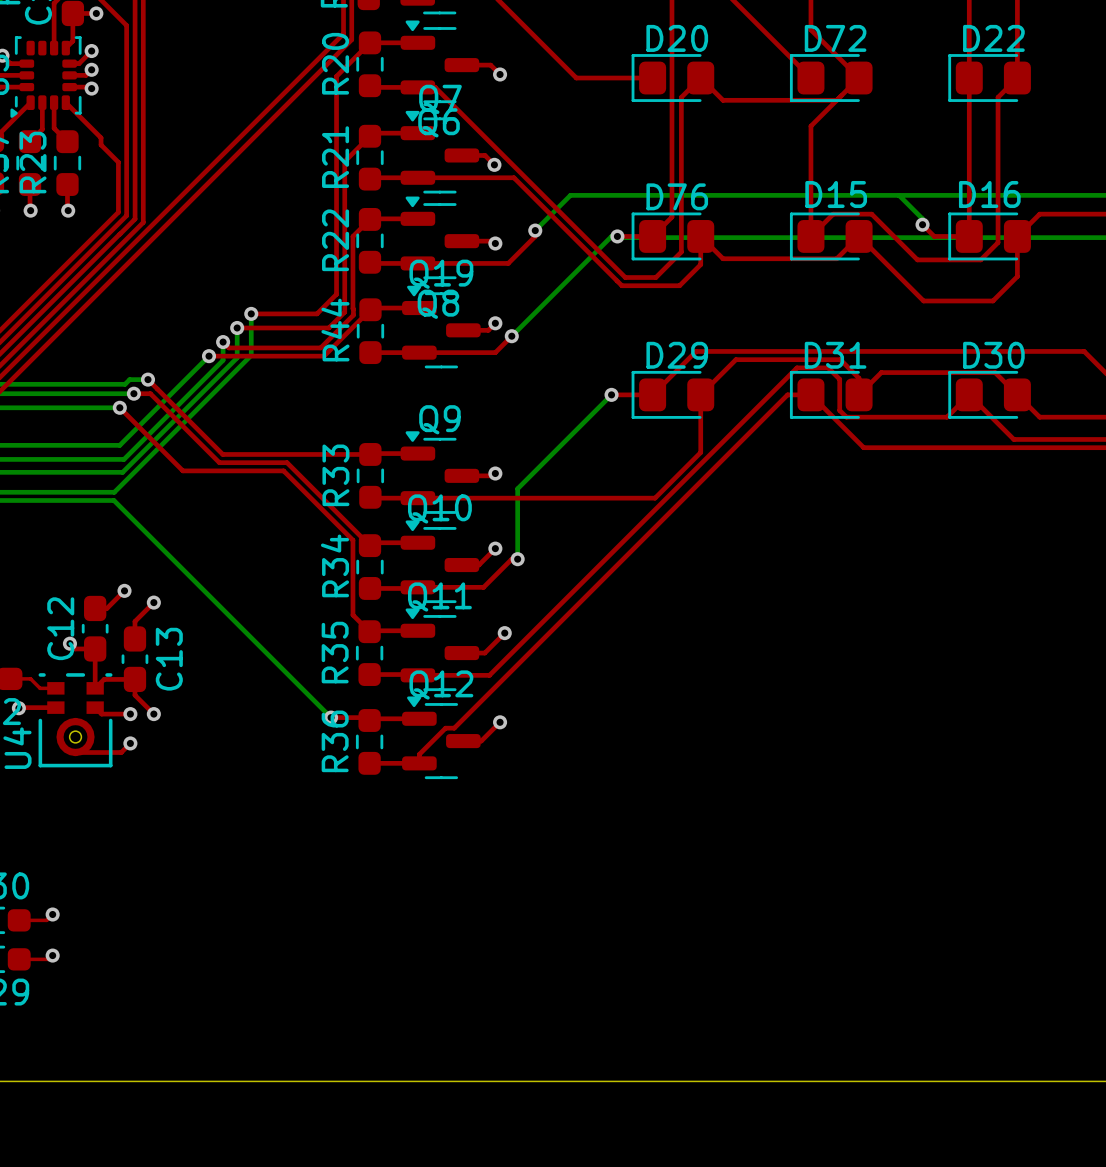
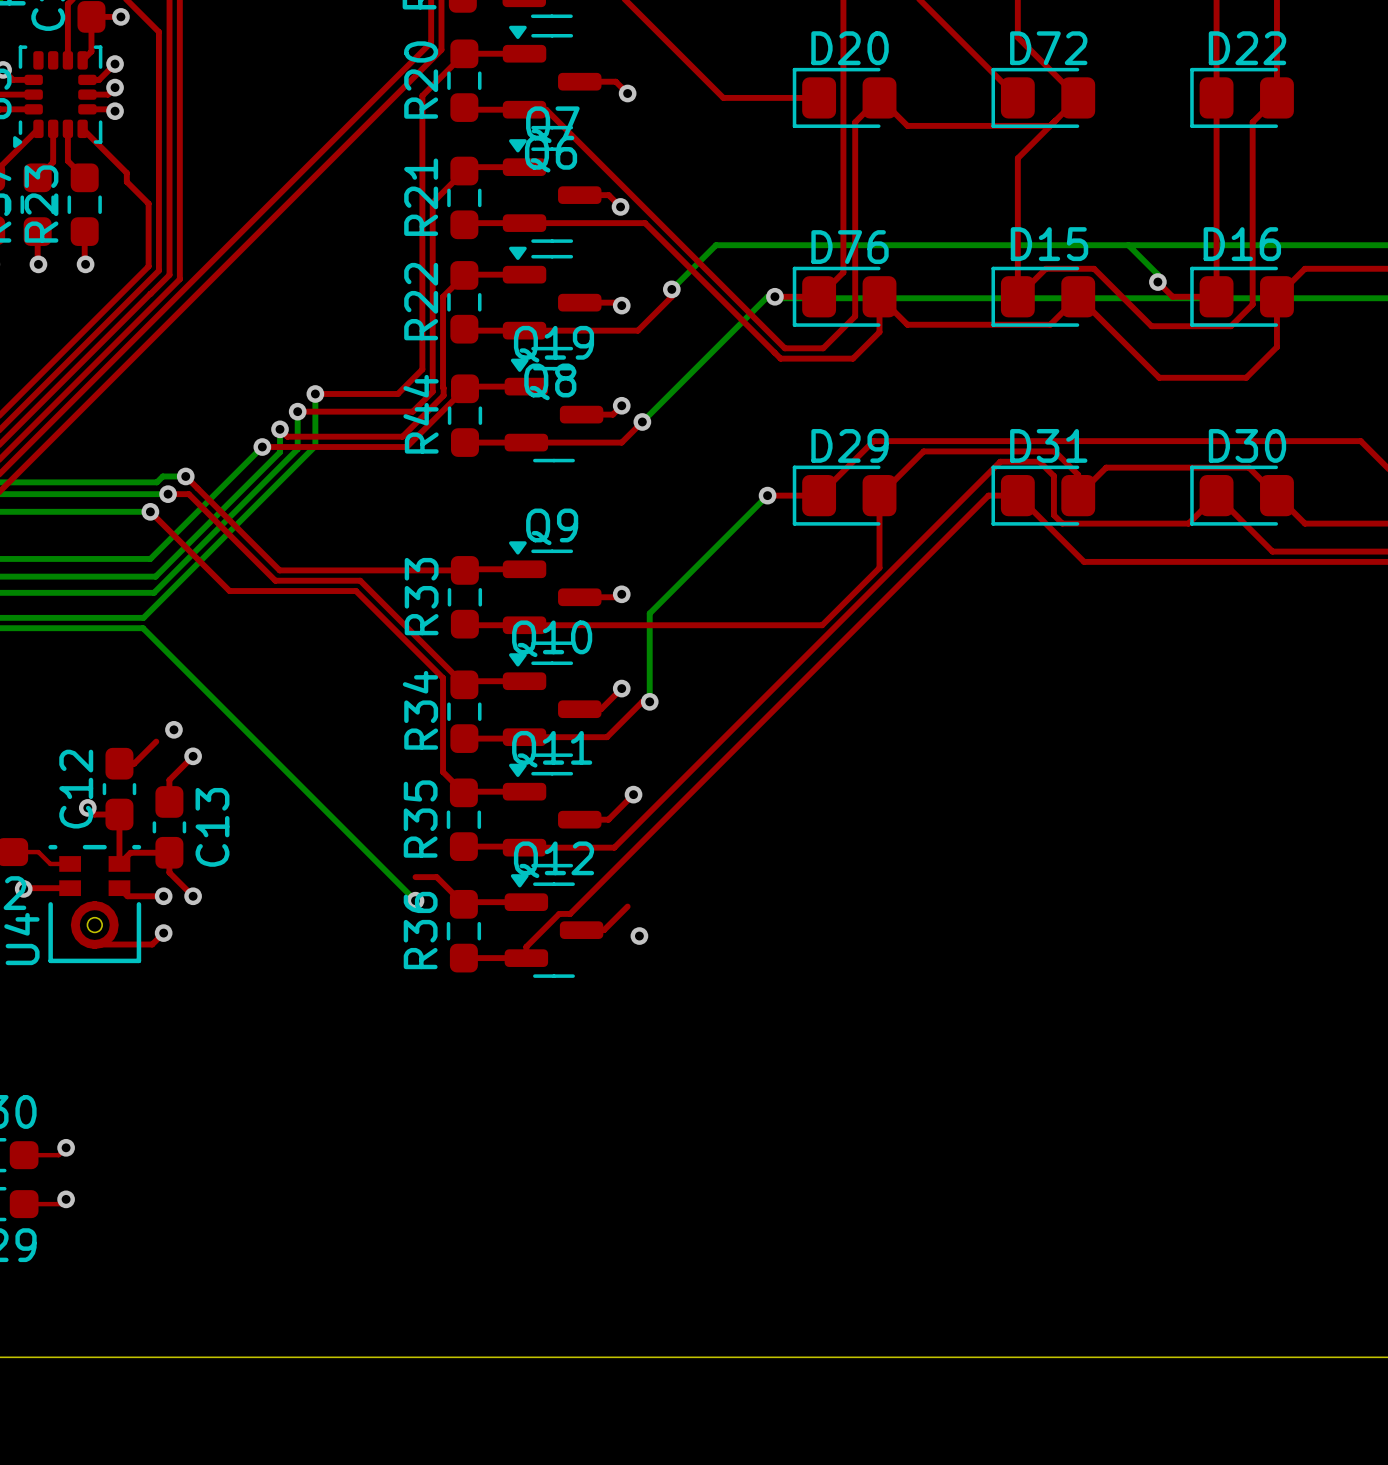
via position: (124, 590) -> (173, 729)
top track: (331, 717) (366, 717) -> (415, 877) (436, 877) (460, 900)
via position: (500, 722) -> (639, 936)

